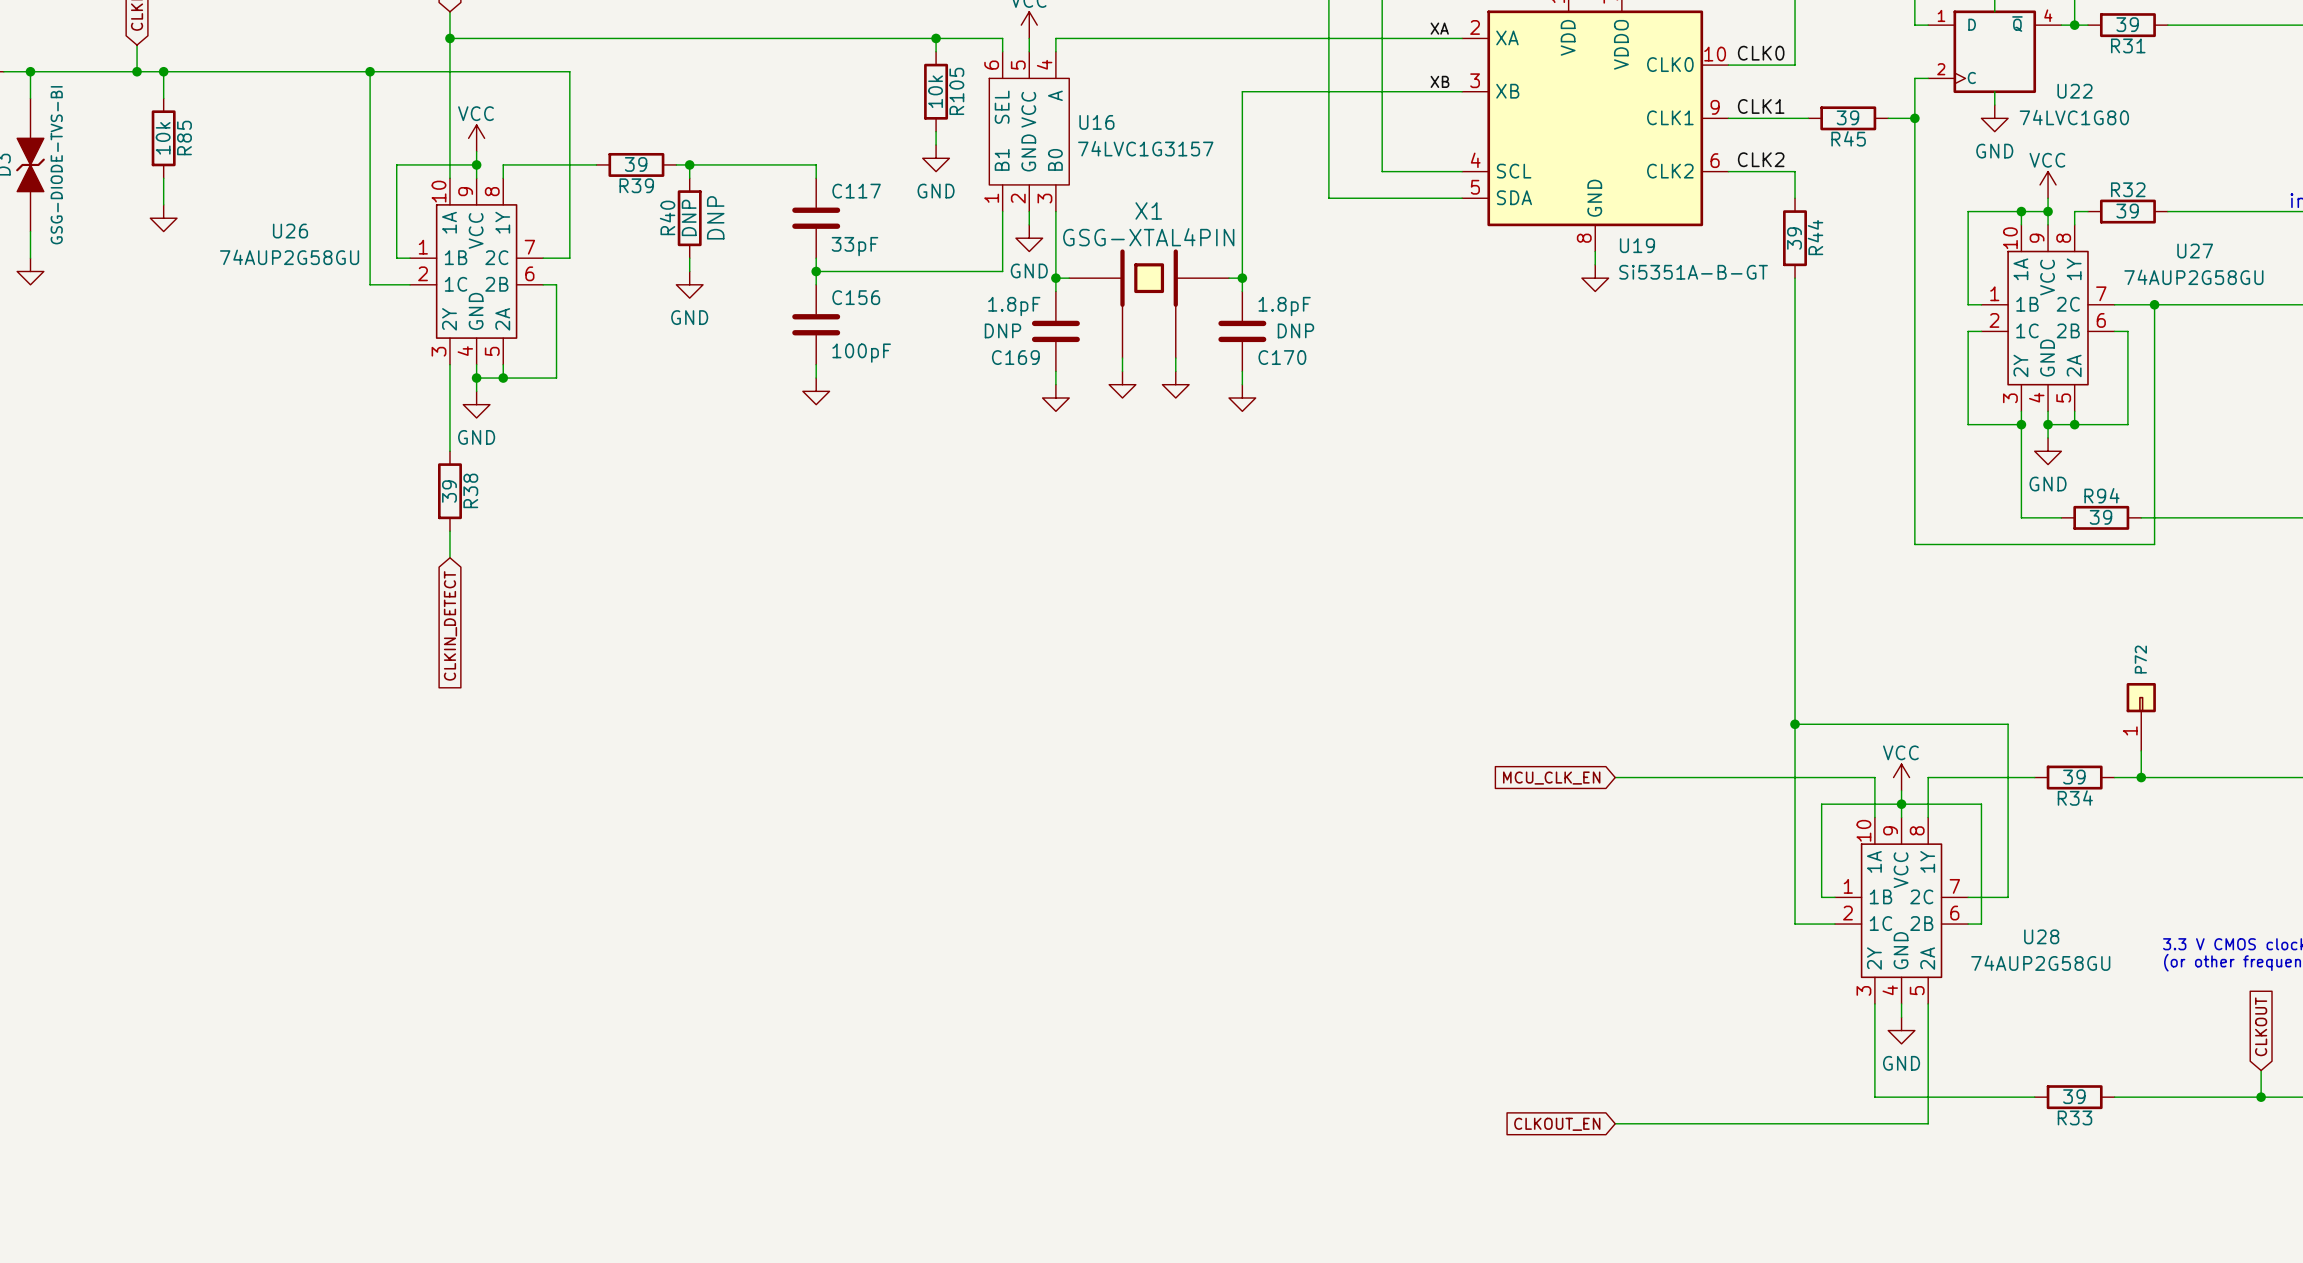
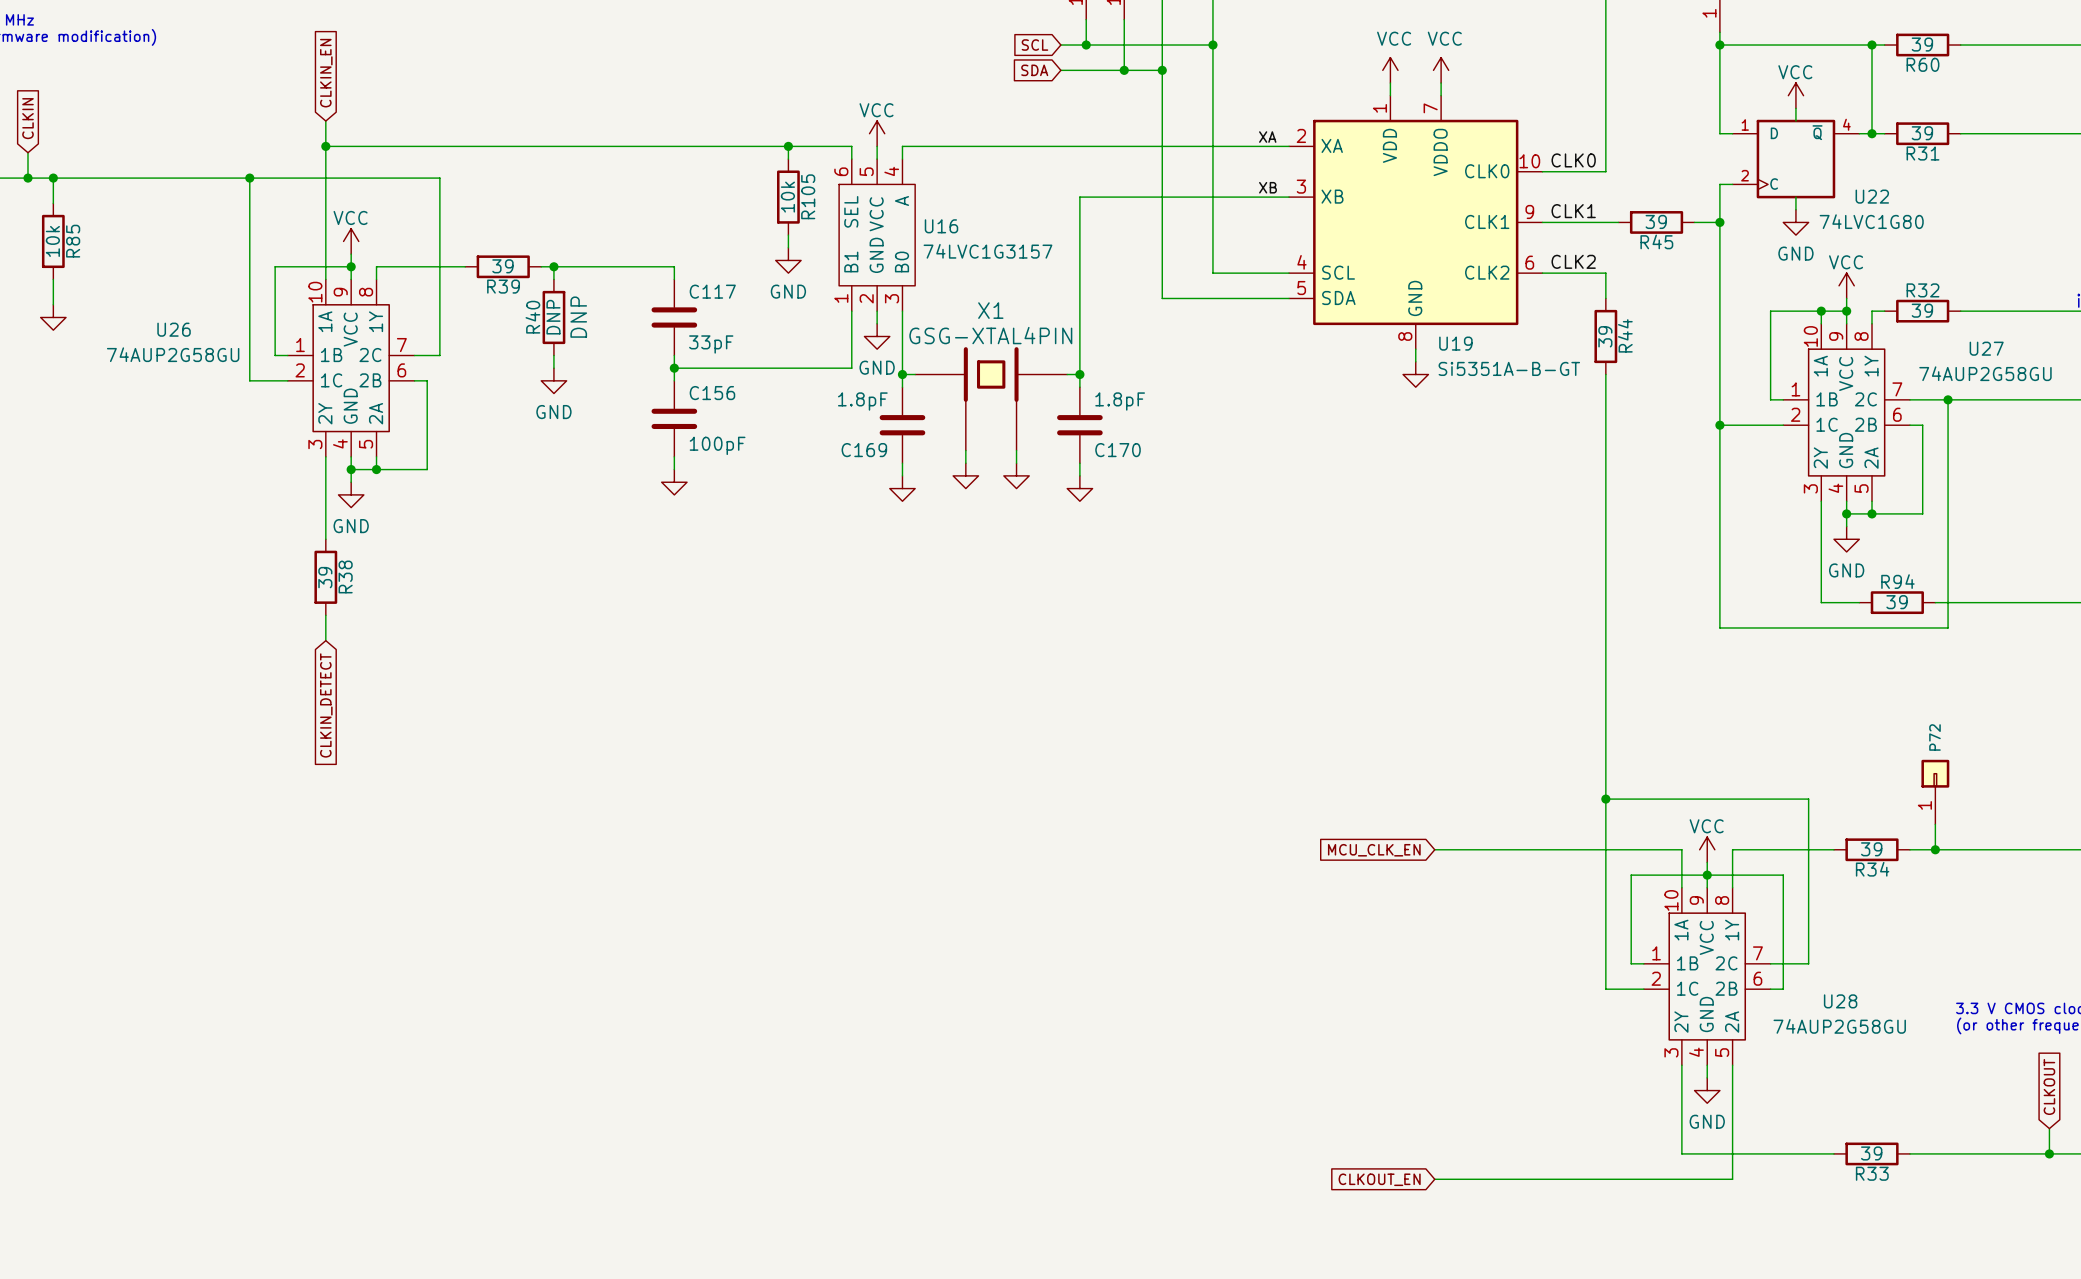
C169 text: DNP (1002, 330) -> none
C170 text: DNP (1295, 330) -> none
junction: none -> (1719, 425)
wire: (1968, 331) (1968, 424) (2021, 424) -> (1770, 425) (1719, 425)
junction: (2021, 424) -> none

